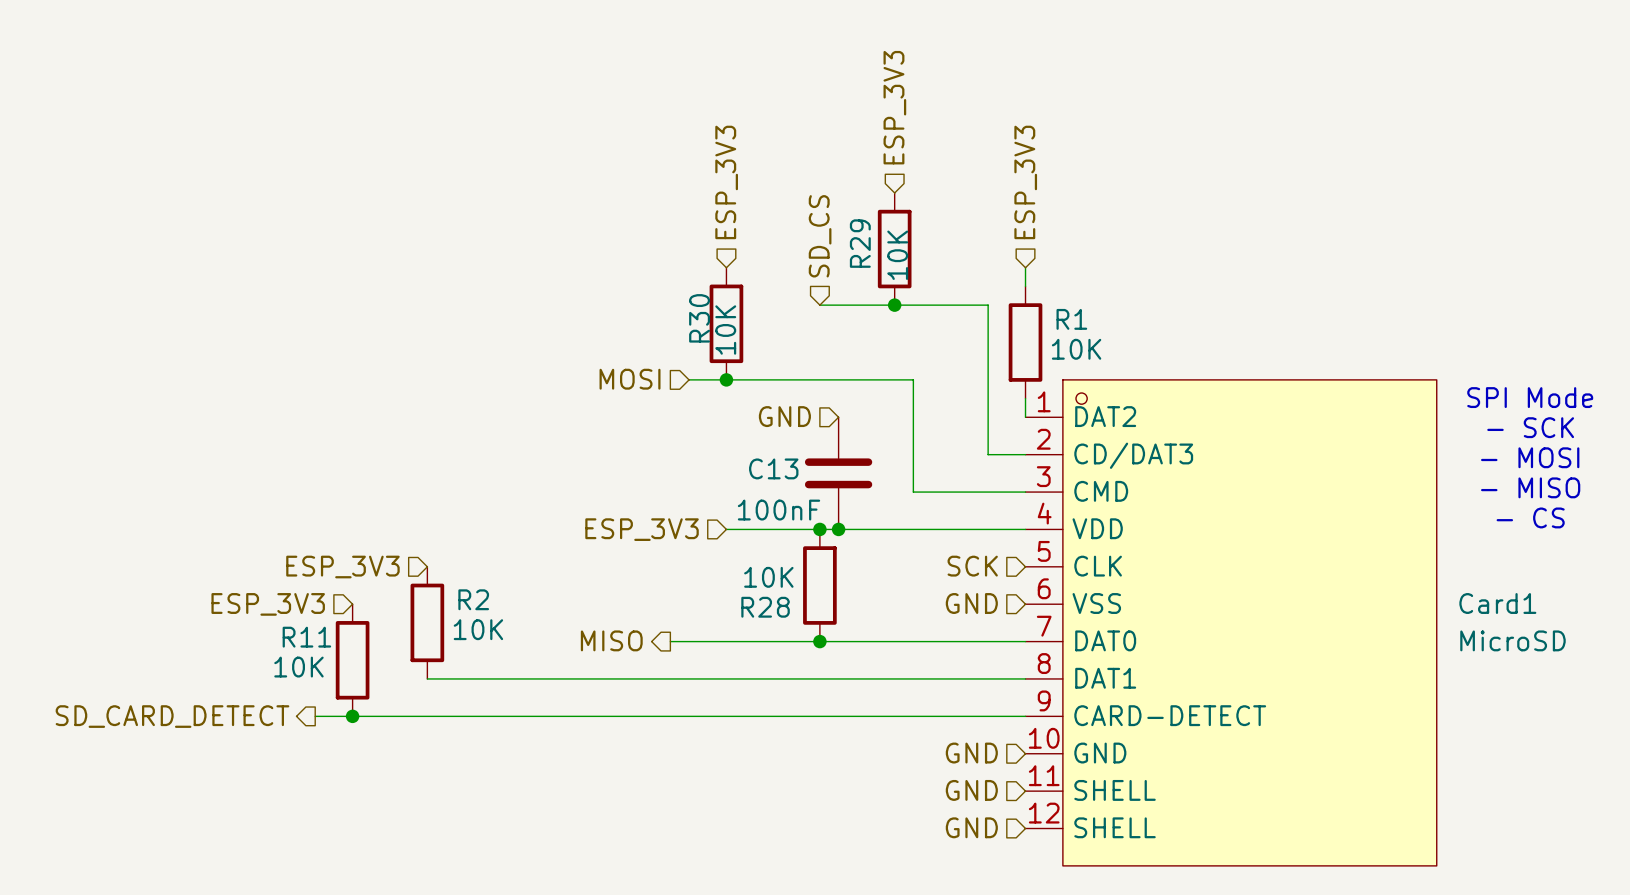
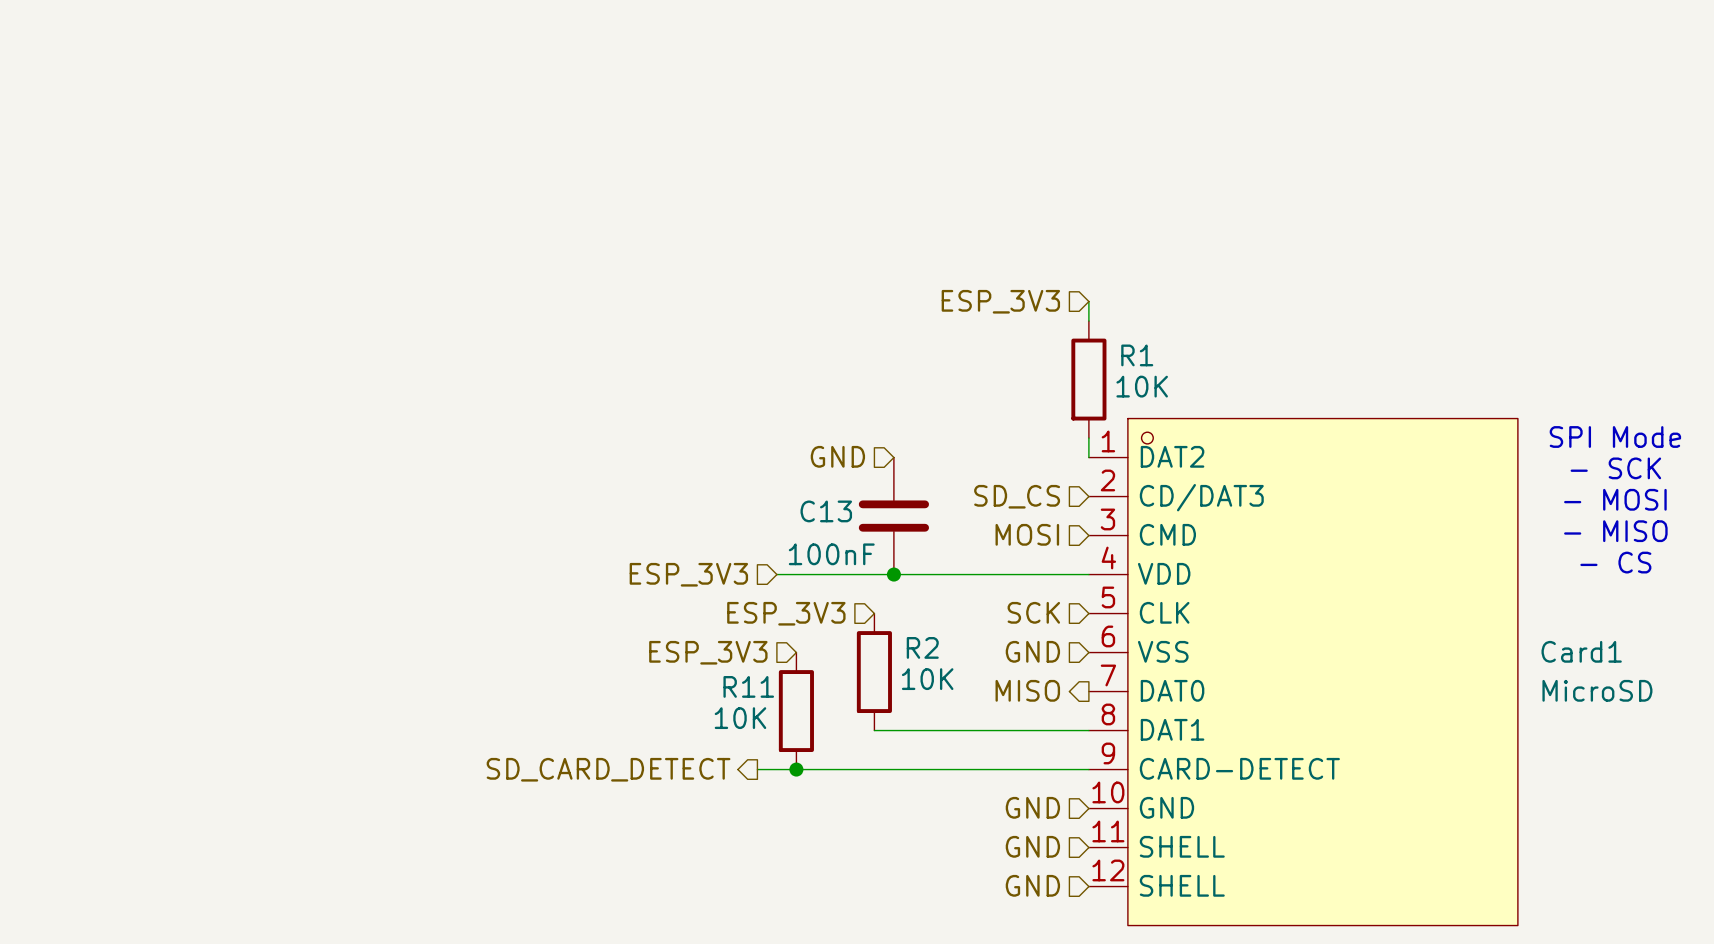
hierarchical label: ESP_3V3 (894, 107) -> none
hierarchical label: ESP_3V3 (726, 182) -> none
hierarchical label rotation: 0° (1025, 182) -> 90° counterclockwise (1000, 301)
hierarchical label rotation: 0° (820, 236) -> 90° counterclockwise (1017, 496)
hierarchical label position: SD_CS (820, 236) -> SD_CS (1017, 496)
R29: 10K (894, 249) -> none
wire: (819, 305) (988, 305) (988, 454) (1025, 454) -> none
junction: (894, 305) -> none
R30: 10K (726, 323) -> none
hierarchical label position: MOSI (630, 379) -> MOSI (1027, 534)
wire: (689, 379) (913, 379) (913, 492) (1025, 492) -> none
junction: (726, 379) -> none
junction: (819, 529) -> none
hierarchical label: ESP_3V3 (342, 567) -> none
hierarchical label: none -> ESP_3V3 (786, 613)
R28: 10K (819, 585) -> none
hierarchical label: ESP_3V3 (268, 604) -> none
hierarchical label: none -> ESP_3V3 (708, 652)
R2 position: (427, 622) -> (874, 672)
hierarchical label position: MISO (611, 640) -> MISO (1027, 690)
wire: (670, 641) (1025, 641) -> none
junction: (819, 641) -> none
R11 position: (352, 660) -> (796, 711)
wire: (427, 678) (819, 678) -> none
hierarchical label: SD_CARD_DETECT (172, 716) -> none
wire: (315, 716) (707, 716) -> none
junction: (352, 716) -> none
hierarchical label: none -> SD_CARD_DETECT (608, 769)
junction: none -> (796, 769)

